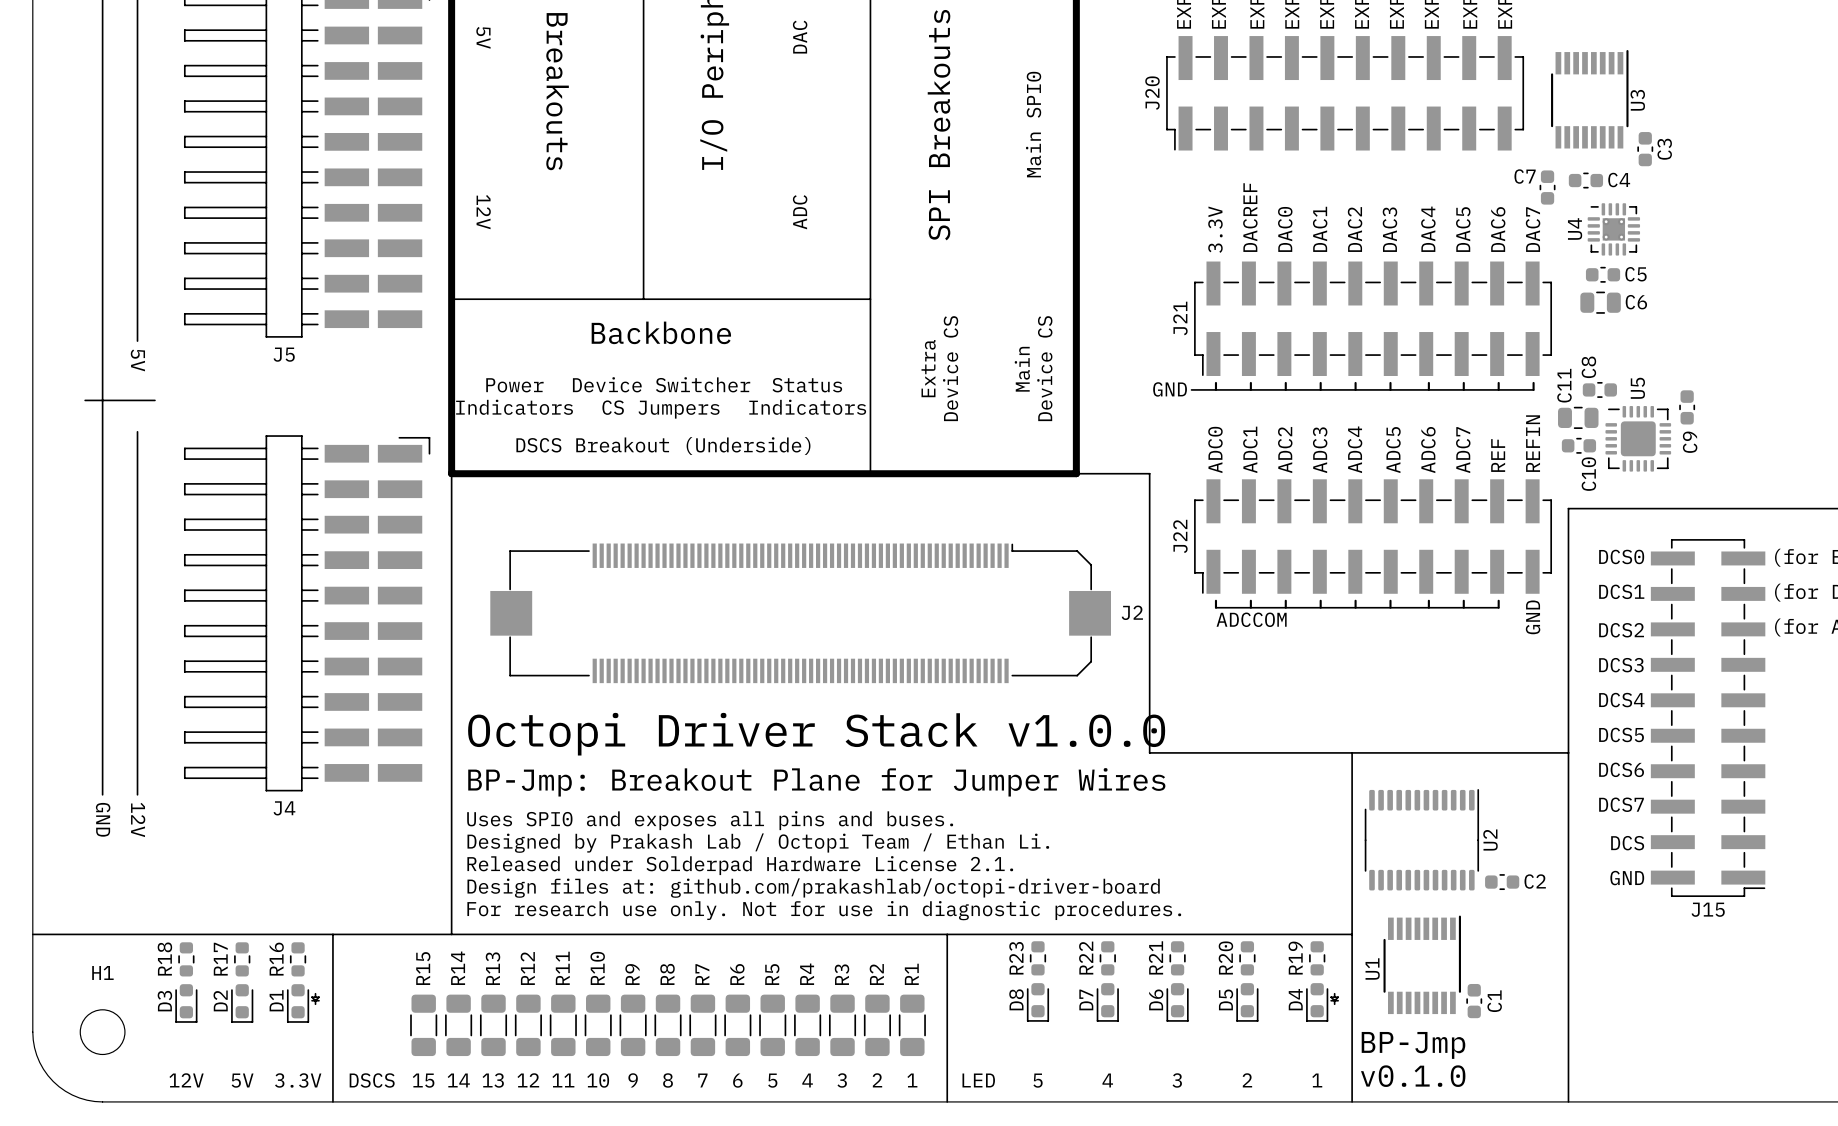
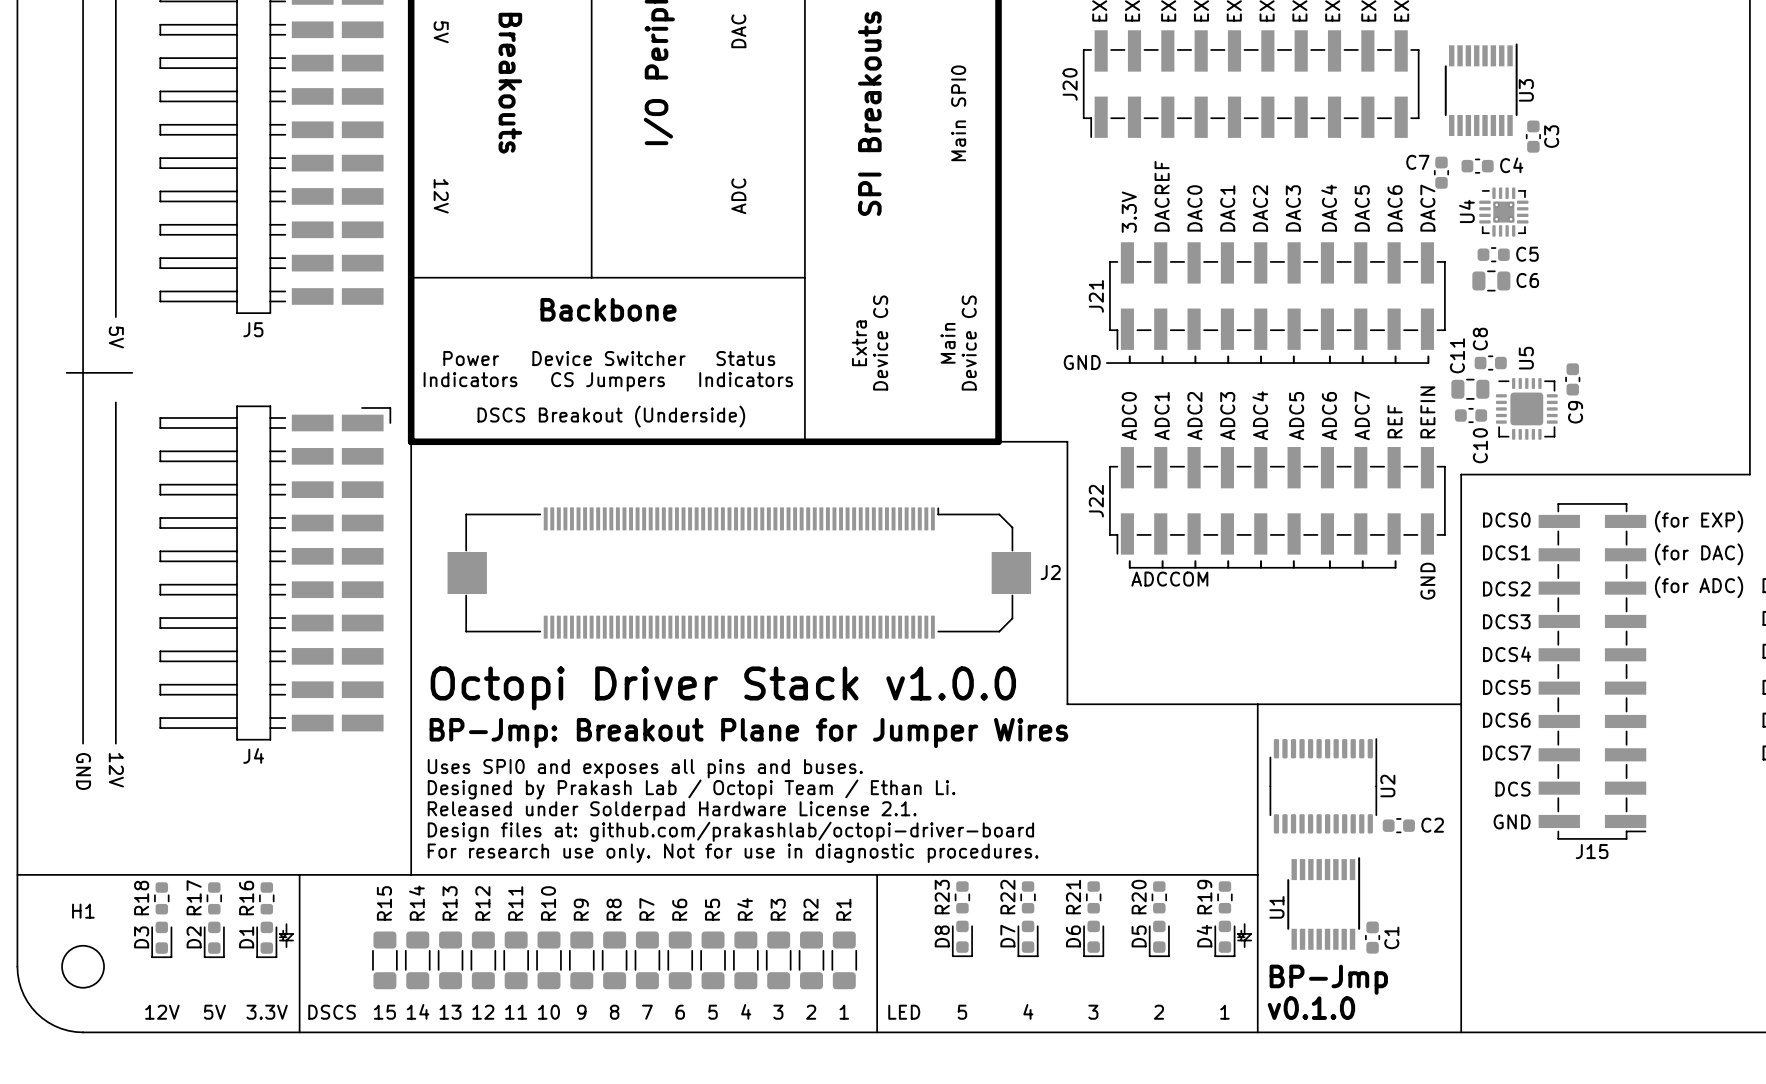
line: none -> (286, 924) (286, 933) (293, 933) (286, 940) (286, 947)
line: none -> (1244, 924) (1244, 933) (1251, 933) (1244, 940) (1244, 947)
line: none -> (279, 940) (293, 940)
line: none -> (1238, 940) (1251, 940)

